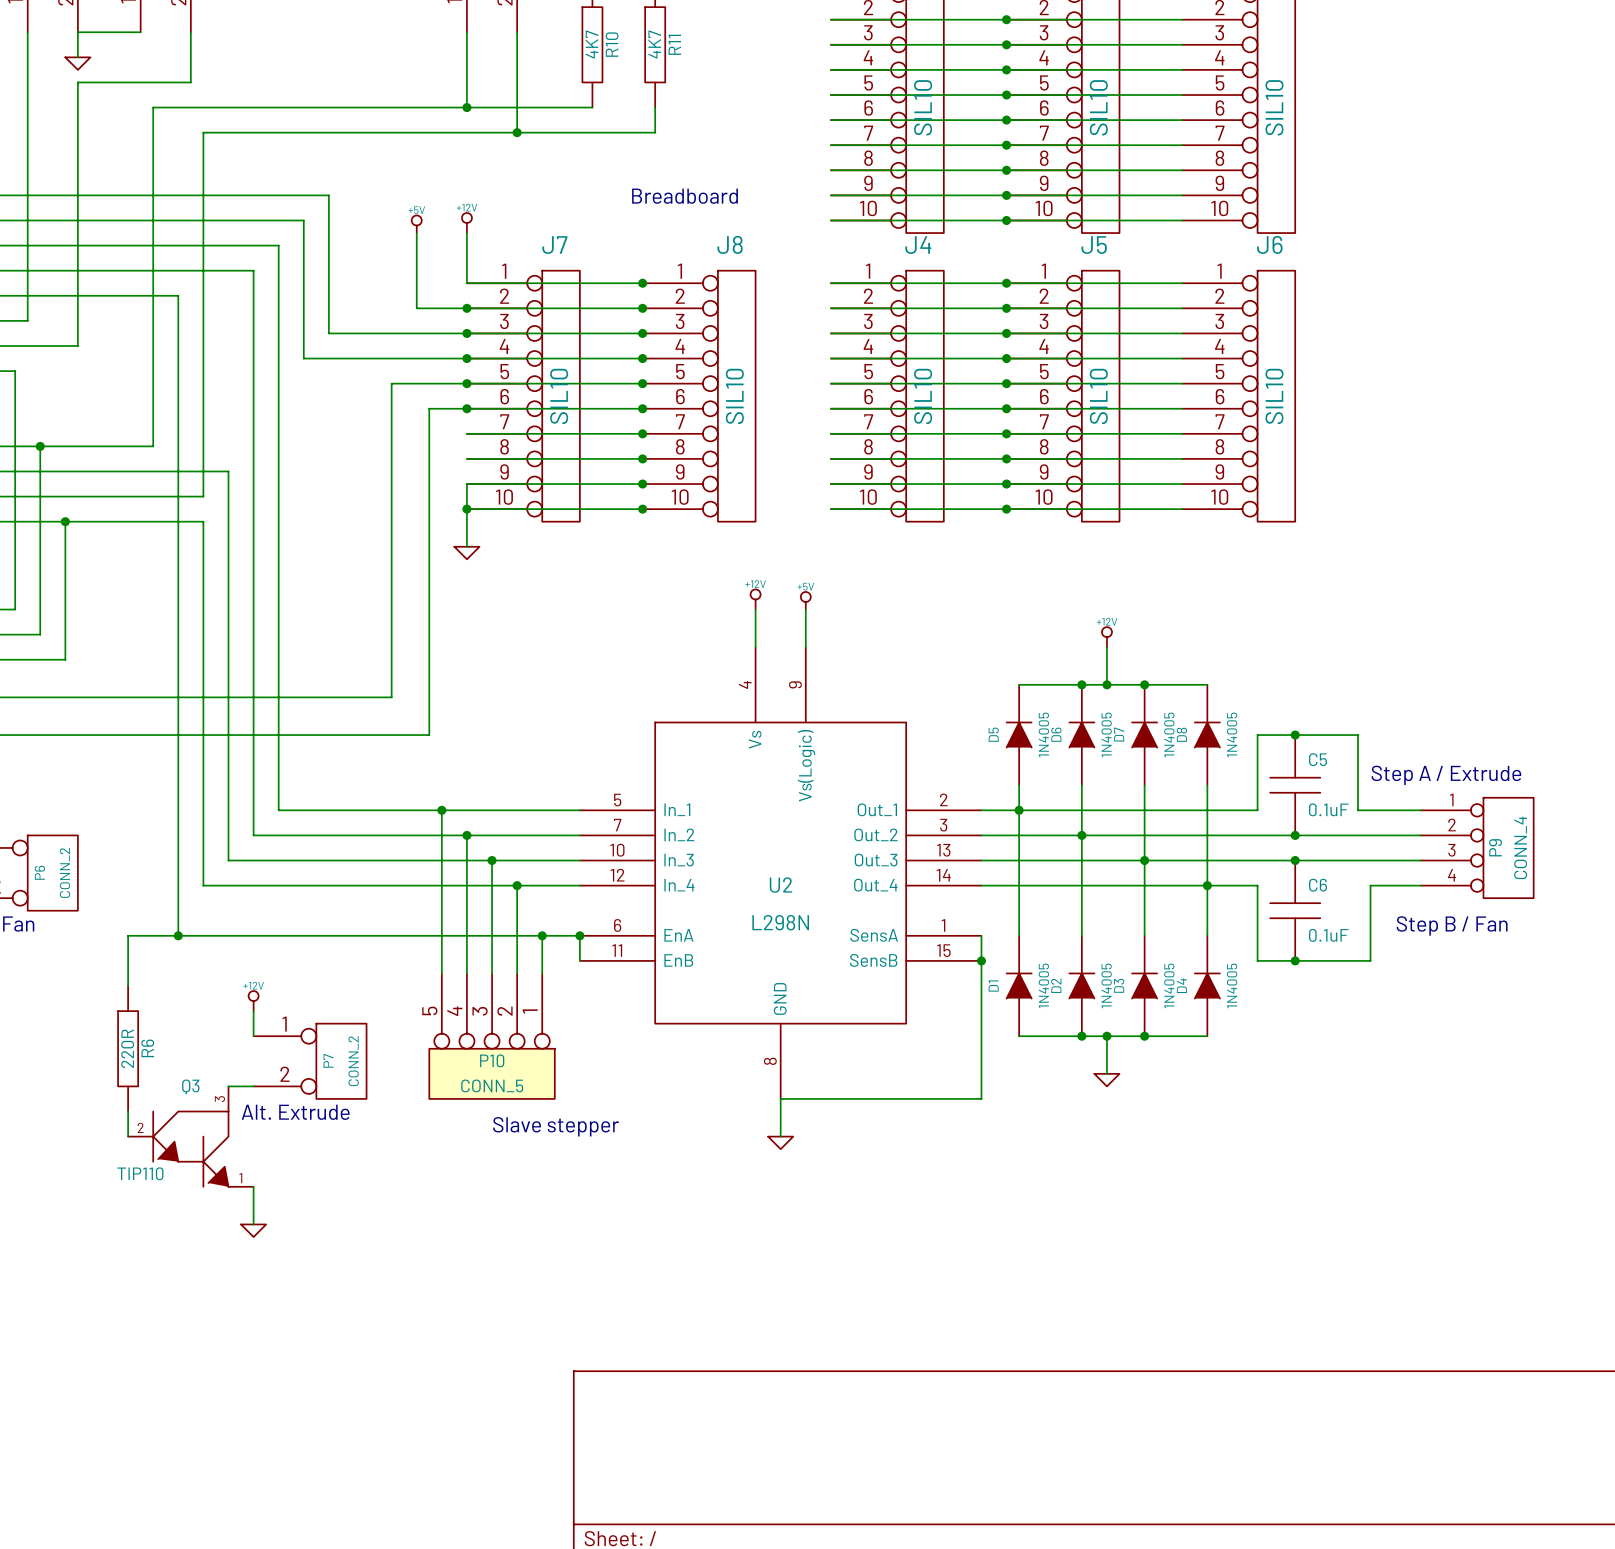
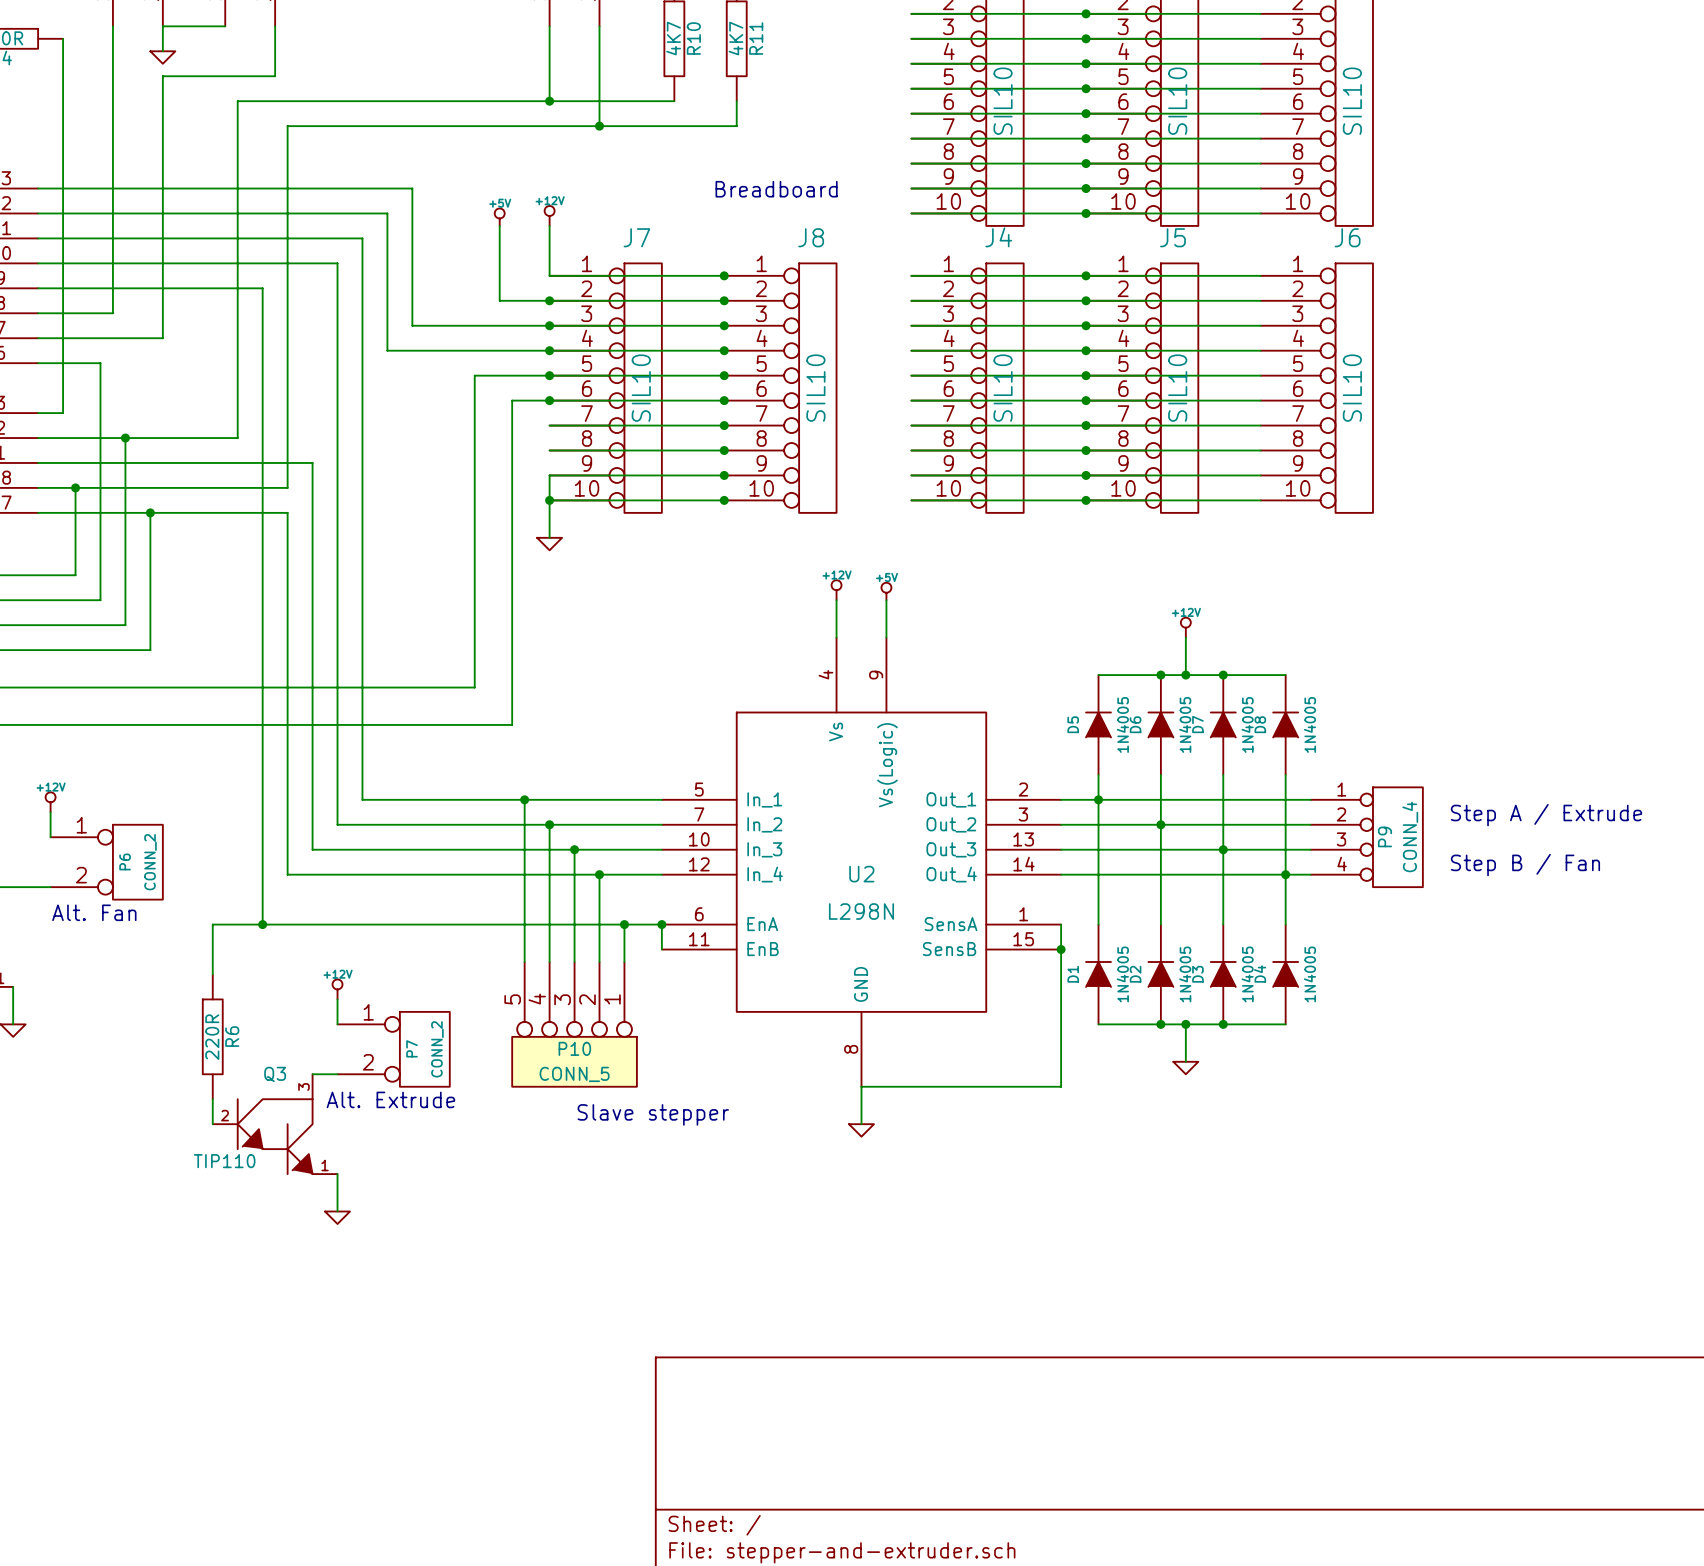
junction: (1295, 735) -> none
text position: Step A / Extrude (1446, 775) -> Step A / Extrude (1546, 815)
C5: 0.1uF (1295, 785) -> none
wire: (1232, 810) (1257, 810) (1257, 735) (1357, 735) (1357, 810) (1420, 810) -> none
wire: (1232, 835) (1420, 835) -> none
junction: (1295, 835) -> none
P9 position: (1477, 847) -> (1366, 837)
wire: (1232, 860) (1420, 860) -> none
junction: (1295, 860) -> none
wire: (1232, 885) (1257, 885) (1257, 960) (1370, 960) (1370, 885) (1420, 885) -> none
C6: 0.1uF (1295, 910) -> none
text position: Step B / Fan (1452, 925) -> Step B / Fan (1525, 865)
junction: (1295, 960) -> none

